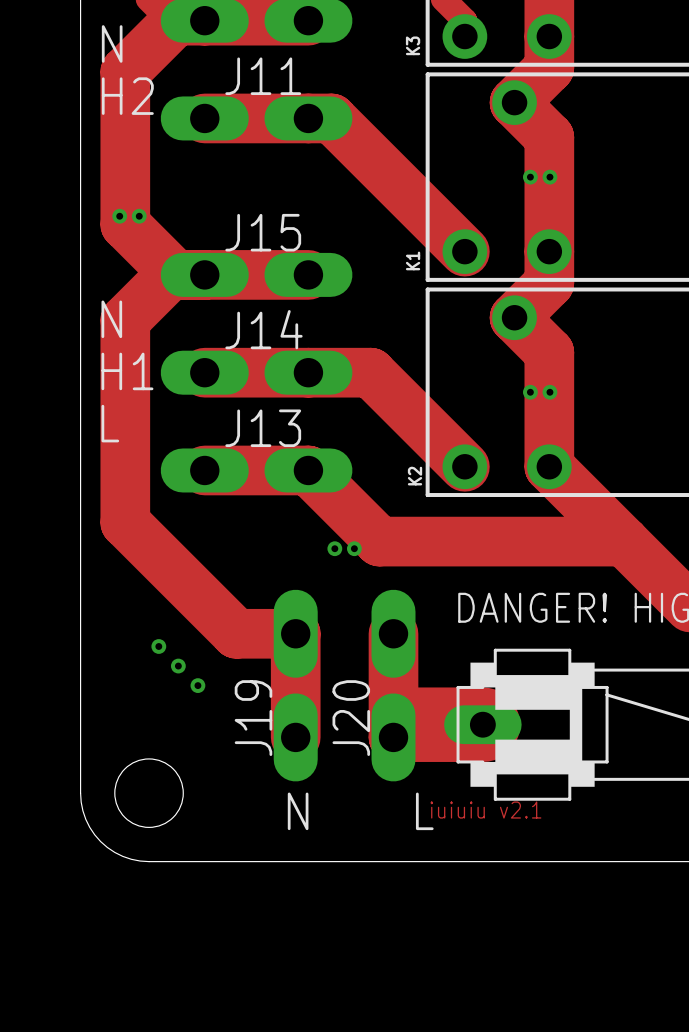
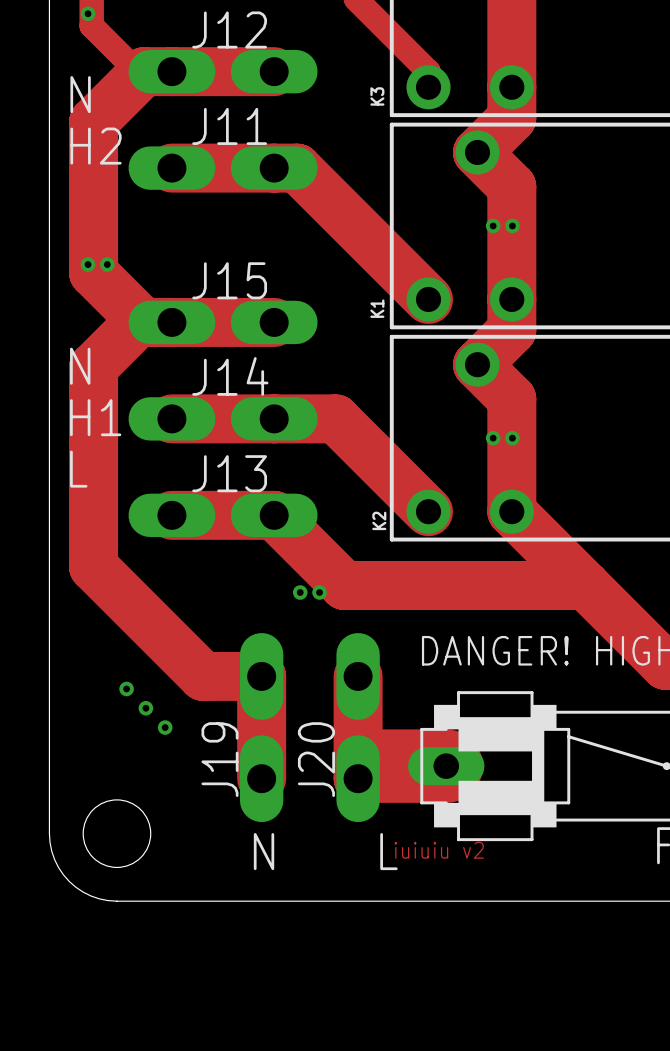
text: iuiuiu v2.1 (485, 810) -> iuiuiu v2 (439, 850)

